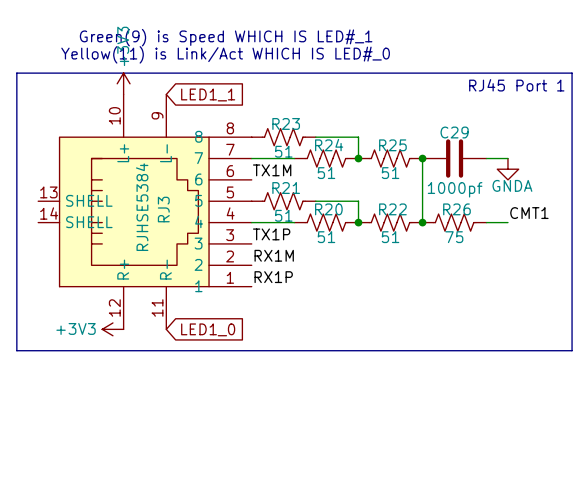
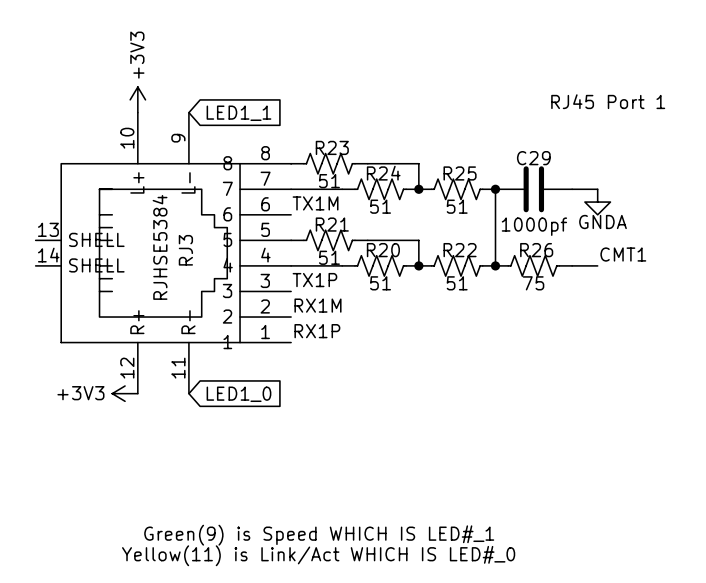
text: Green(9) is Speed WHICH IS LED#_1 (226, 37) -> none
text: Yellow(11) is Link/Act WHICH IS LED#_0 (225, 54) -> none
line: (16, 73) (572, 73) (572, 350) (16, 350) (16, 73) -> none
text: none -> Green(9) is Speed WHICH IS LED#_1 (319, 535)
text: none -> Yellow(11) is Link/Act WHICH IS LED#_0 (318, 555)

